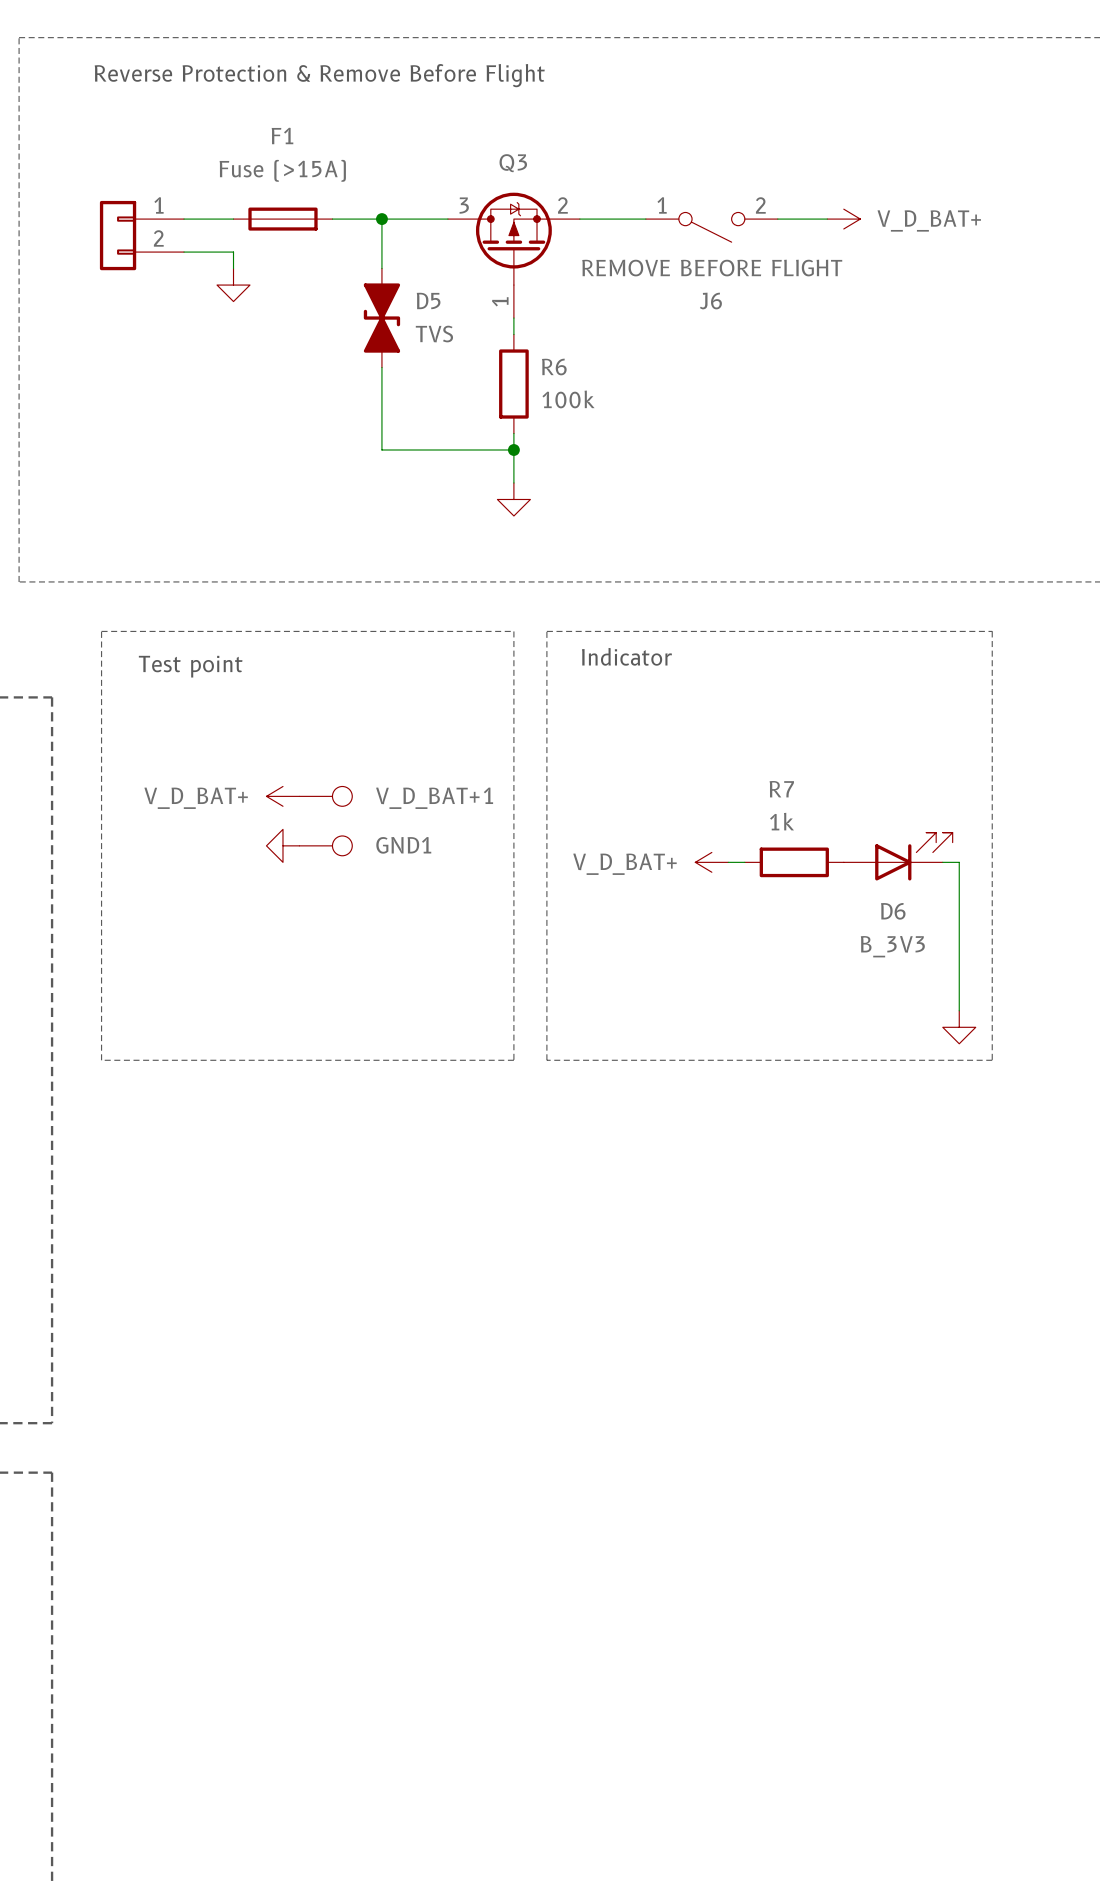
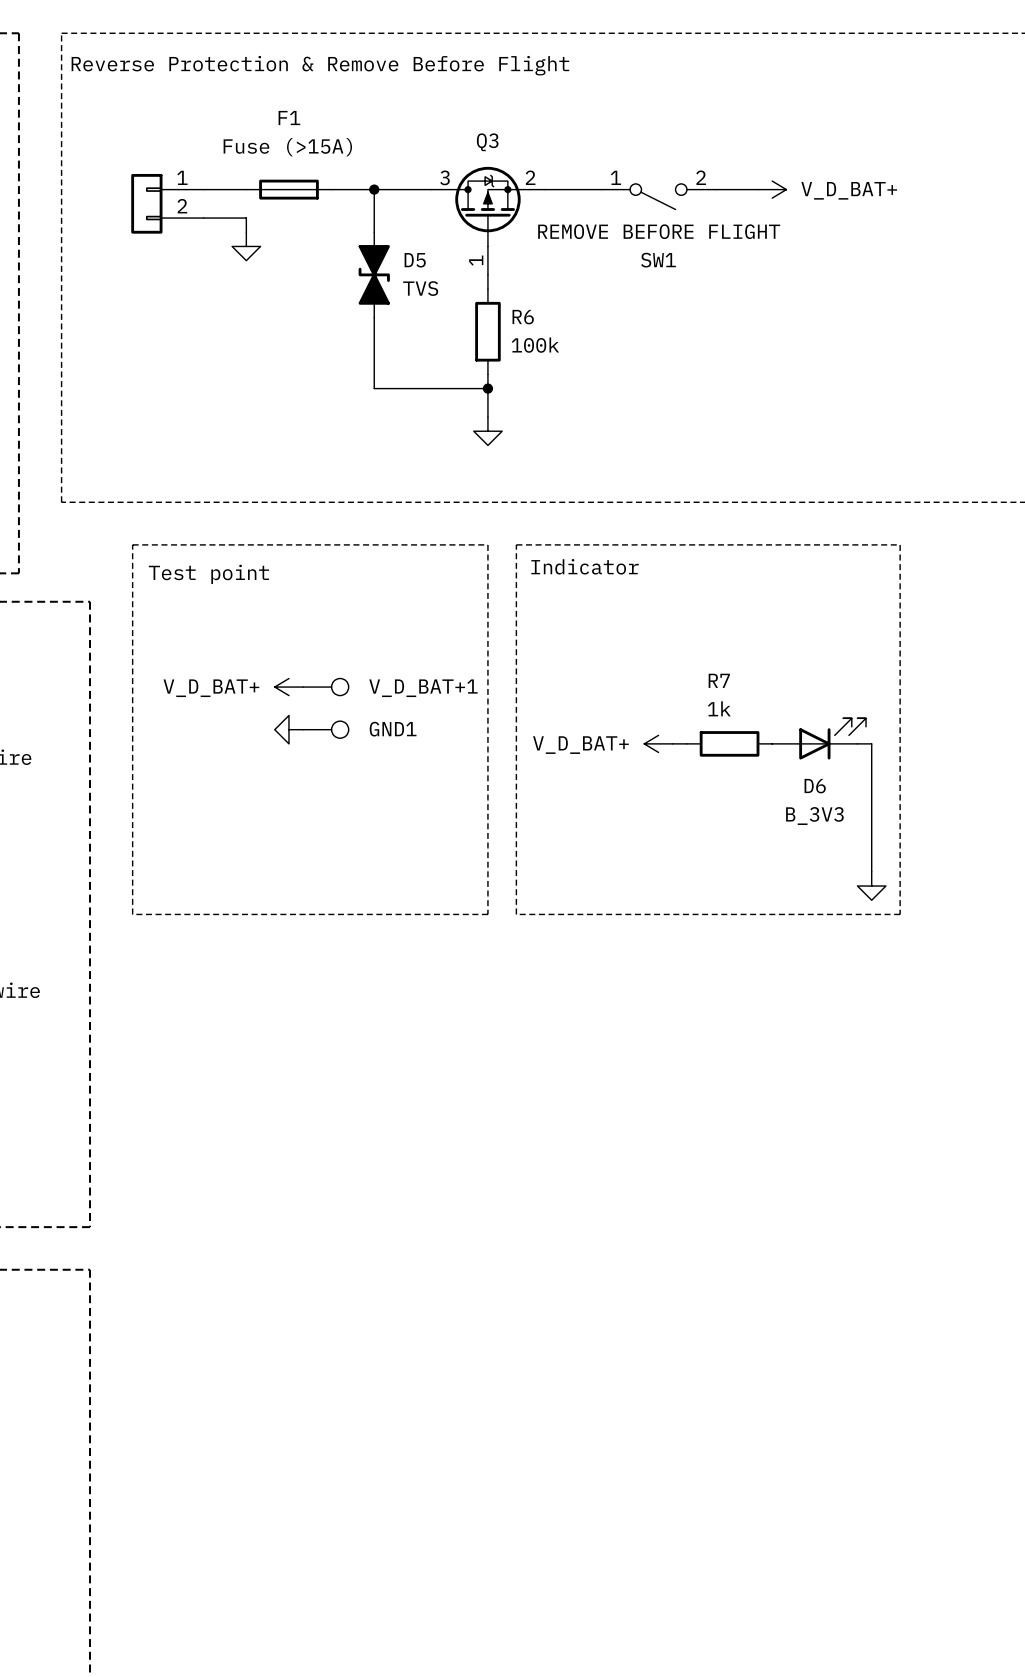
J6 name: J6 (710, 301) -> SW1 (658, 260)

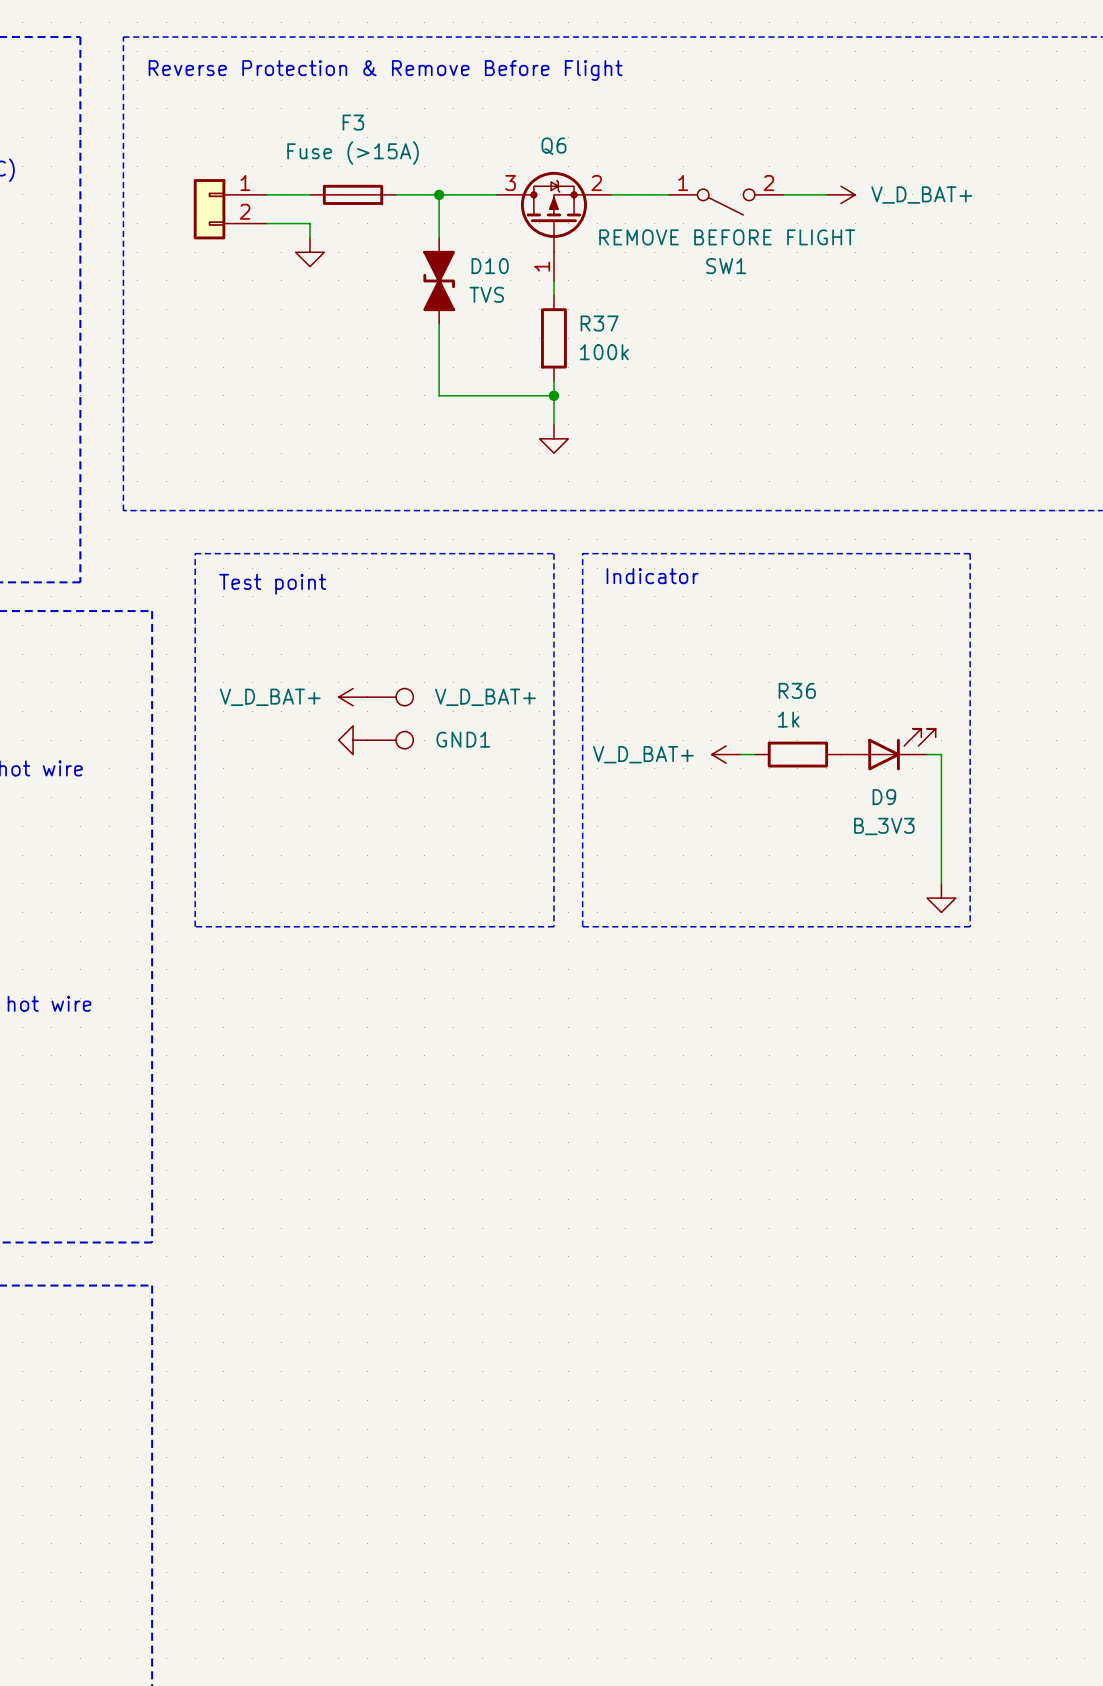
F1 name: F1 (289, 118) -> F3 (353, 122)
Q3 name: Q3 (487, 142) -> Q6 (553, 146)
D5 name: D5 (415, 260) -> D10 (490, 266)
R6 name: R6 (523, 317) -> R37 (599, 323)
R7 name: R7 (719, 680) -> R36 (797, 690)
V_D_BAT+1 name: V_D_BAT+1 (423, 688) -> V_D_BAT+ (485, 697)
D6 name: D6 (815, 786) -> D9 (884, 797)

